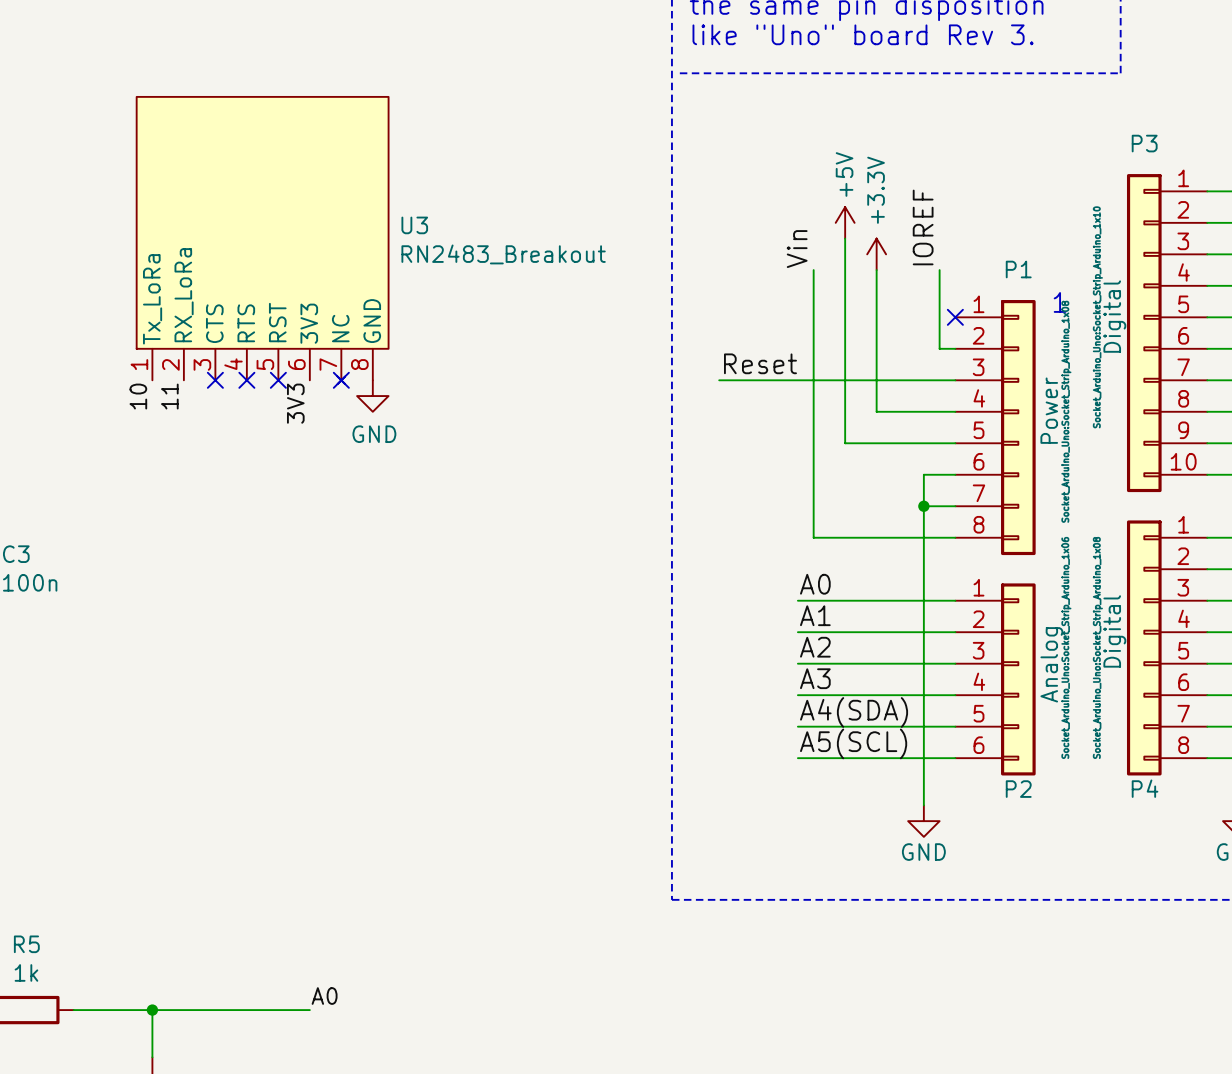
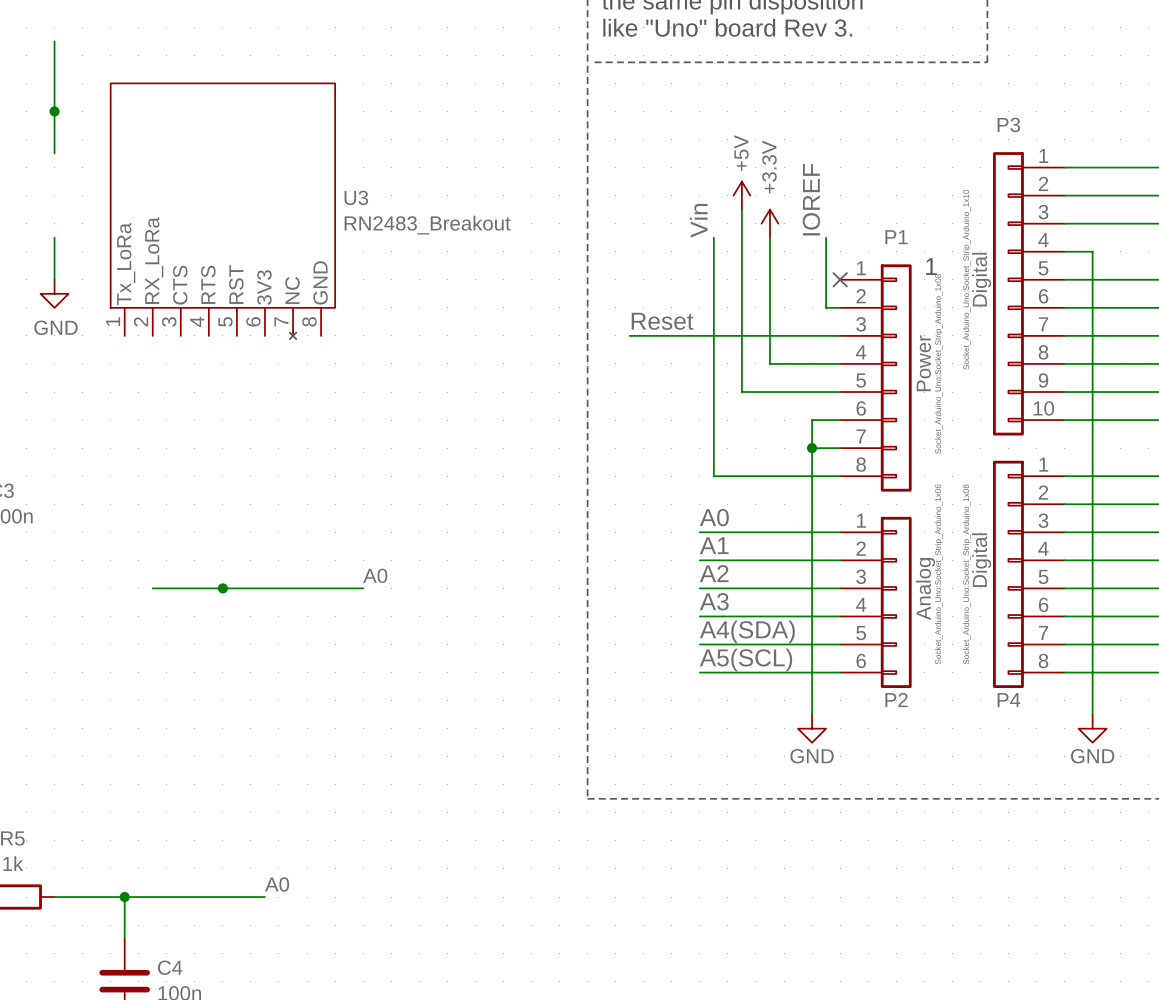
wire: none -> (54, 41) (54, 153)
junction: none -> (54, 111)
wire: none -> (54, 237) (54, 279)
power symbol: none -> GND (54, 293)
no-connect mark: (215, 380) -> none
no-connect mark: (246, 380) -> none
no-connect mark: (278, 380) -> none
no-connect mark: (341, 380) -> none
label: 10 (138, 396) -> none
label: 11 (169, 396) -> none
power symbol: GND (372, 396) -> none
label: 3V3 (295, 403) -> none
label: none -> A0 (375, 575)
wire: none -> (152, 588) (363, 588)
junction: none -> (222, 588)

